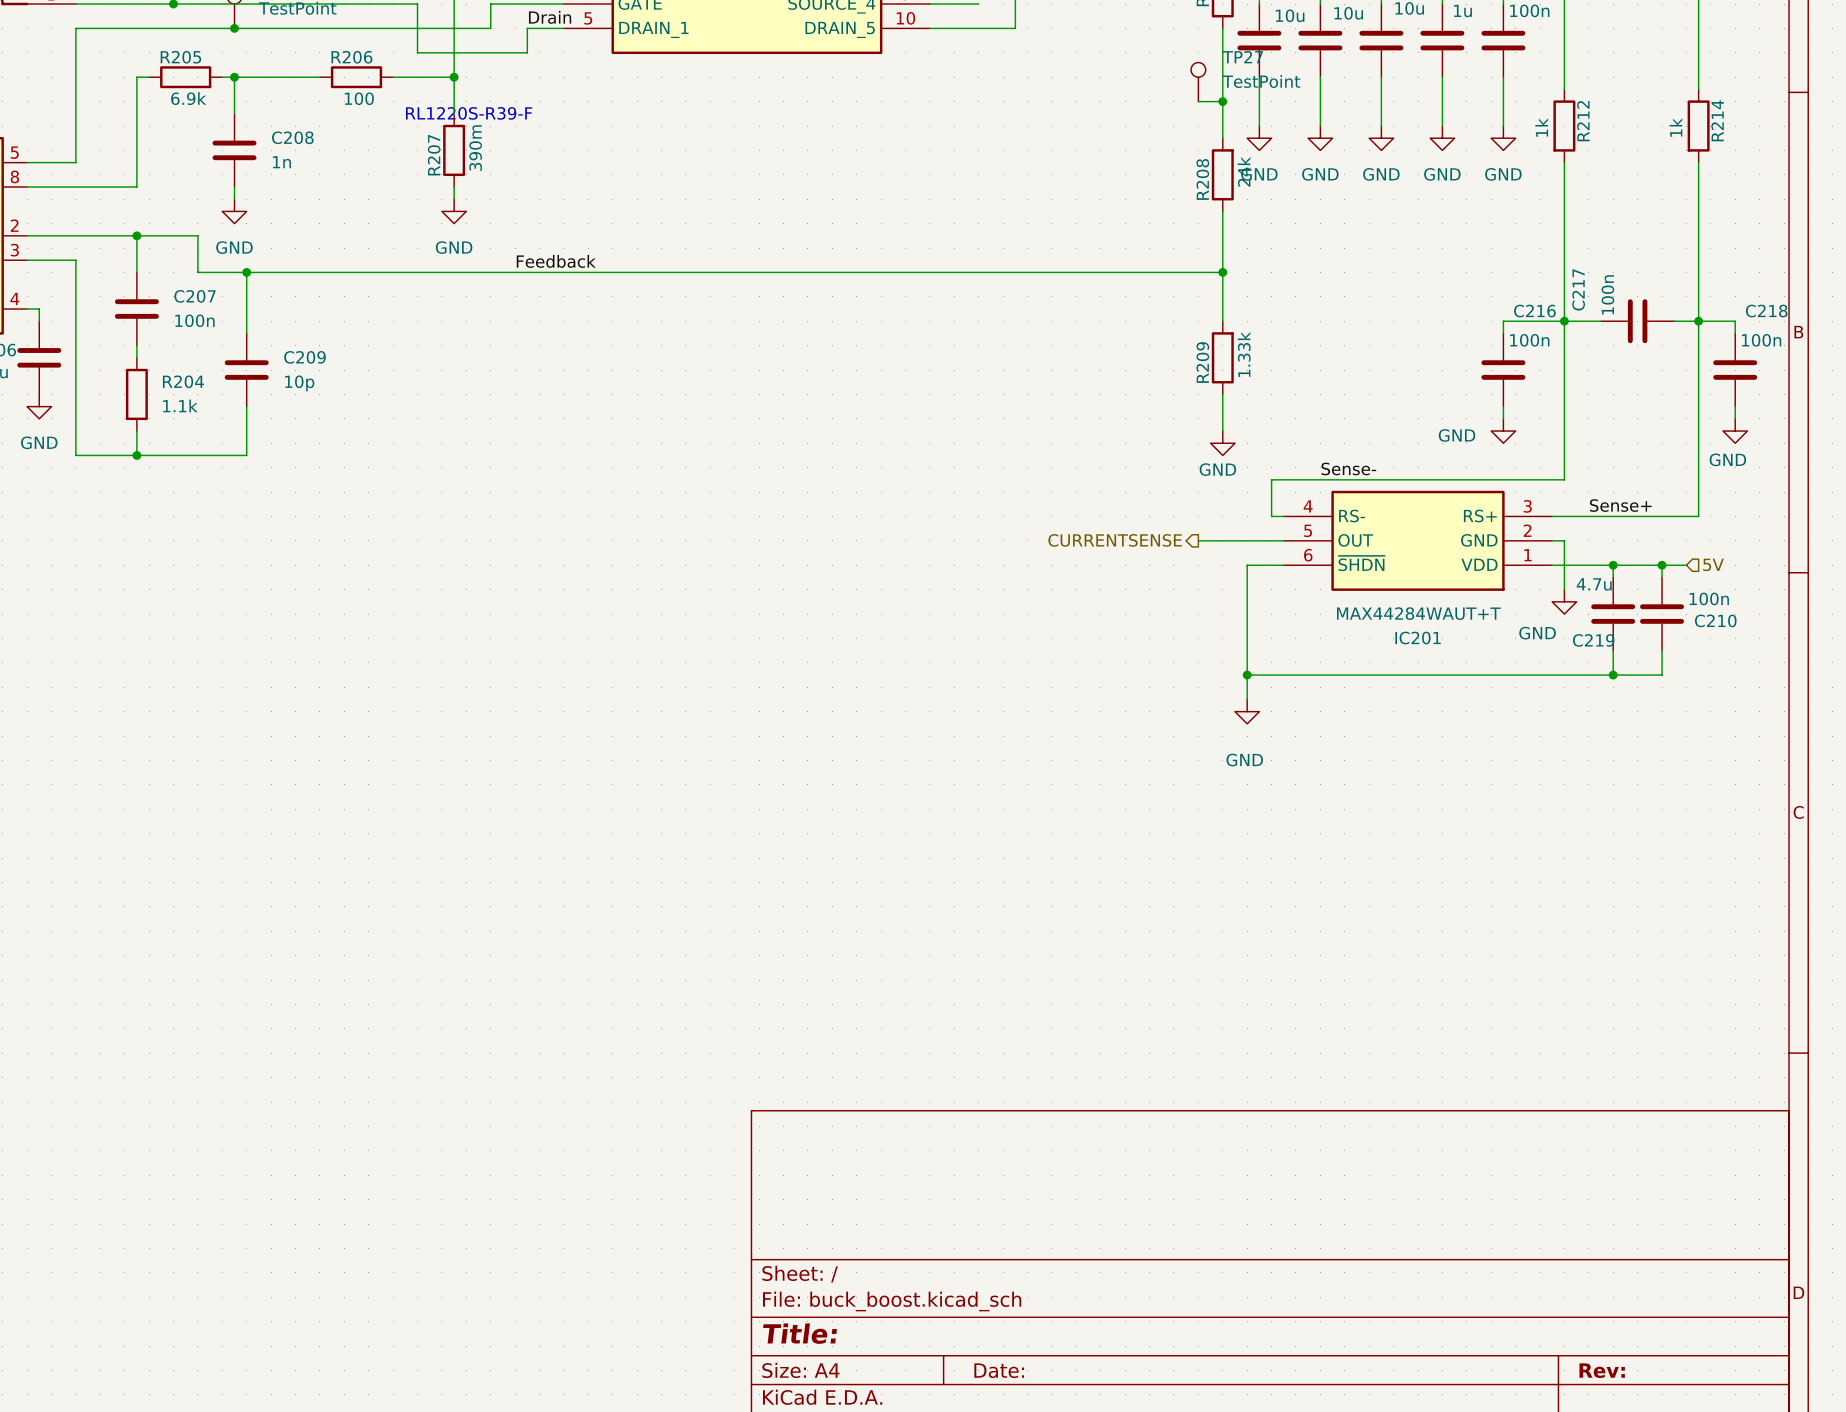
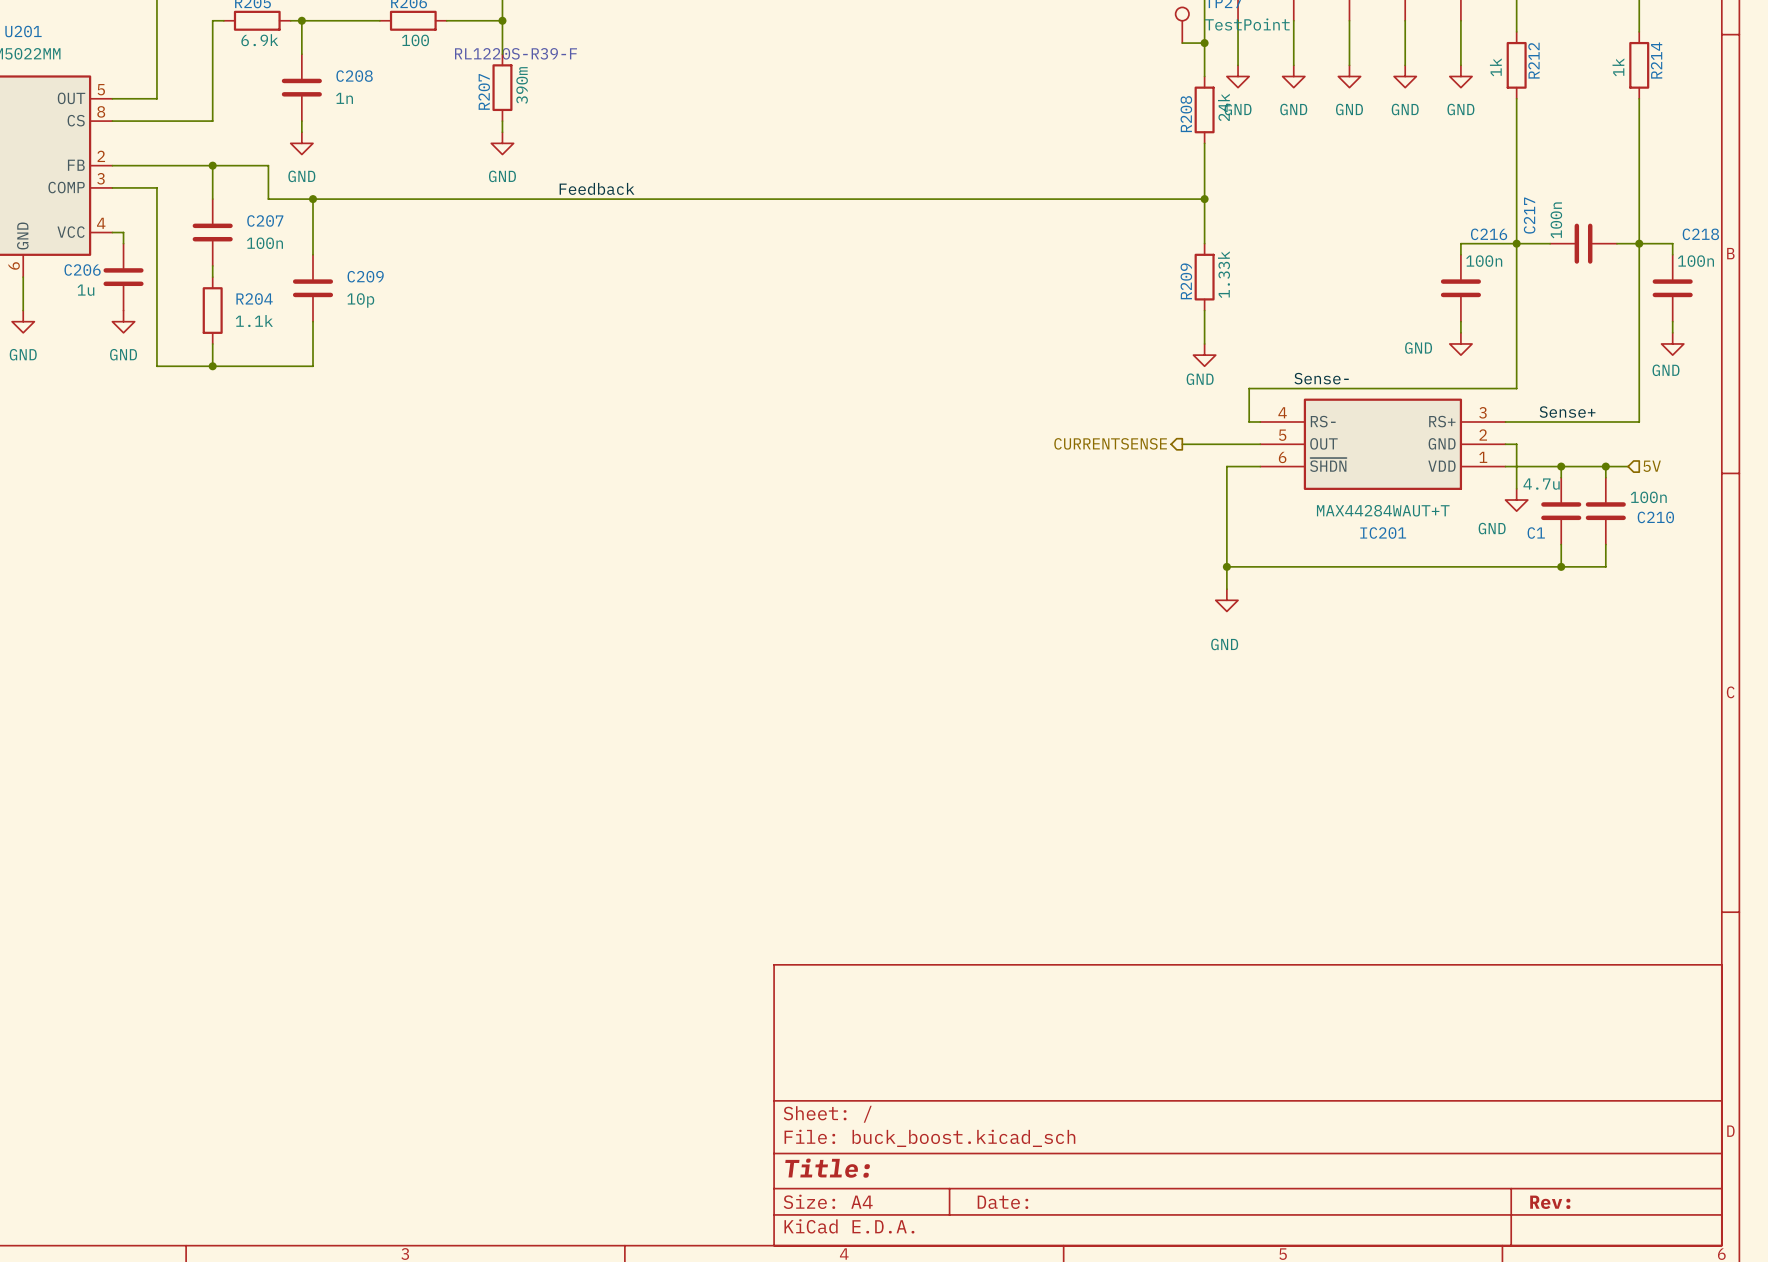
C219 name: C219 (1593, 640) -> C1 (1536, 533)

